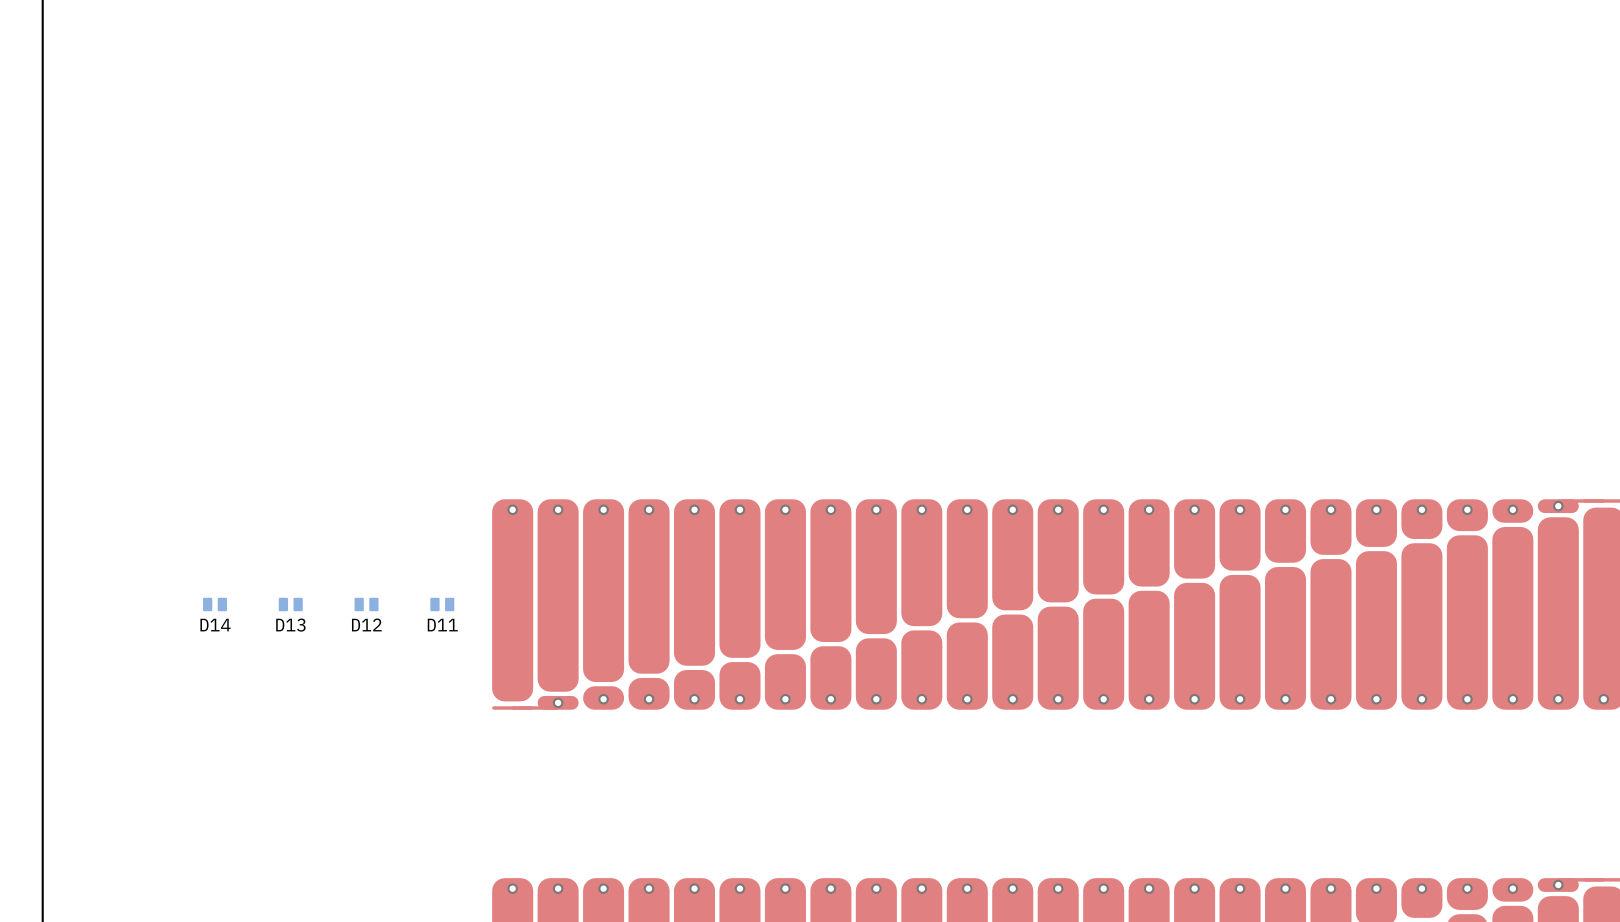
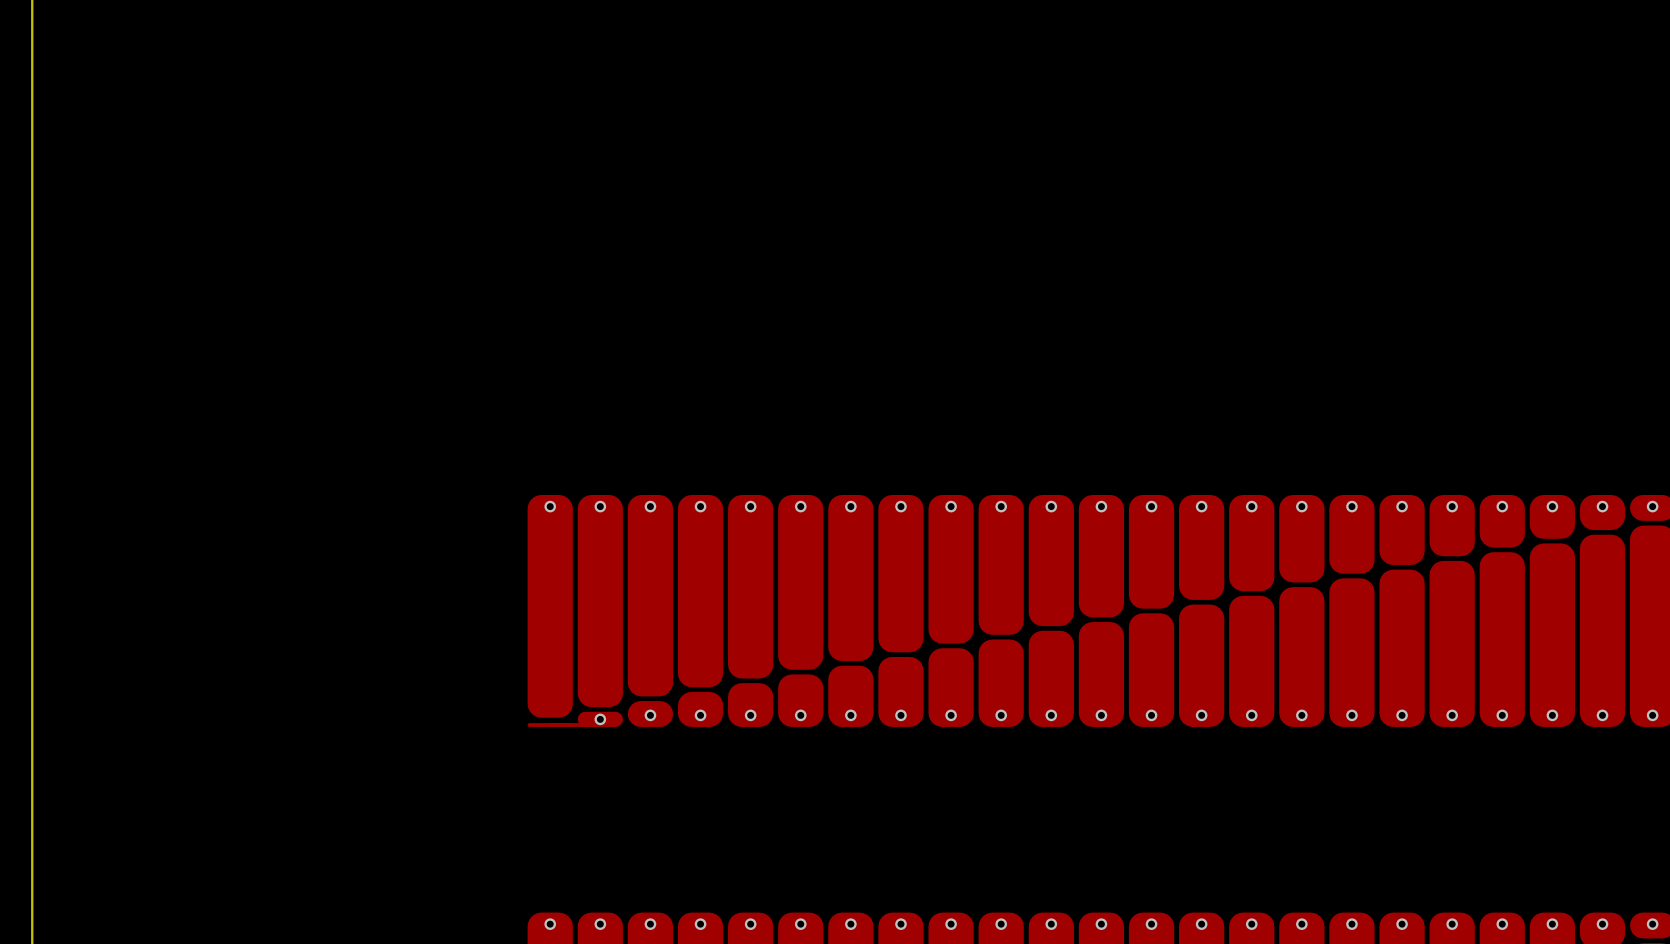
D14: (215, 604) -> none
D13: (290, 604) -> none
D12: (366, 604) -> none
D11: (442, 604) -> none

